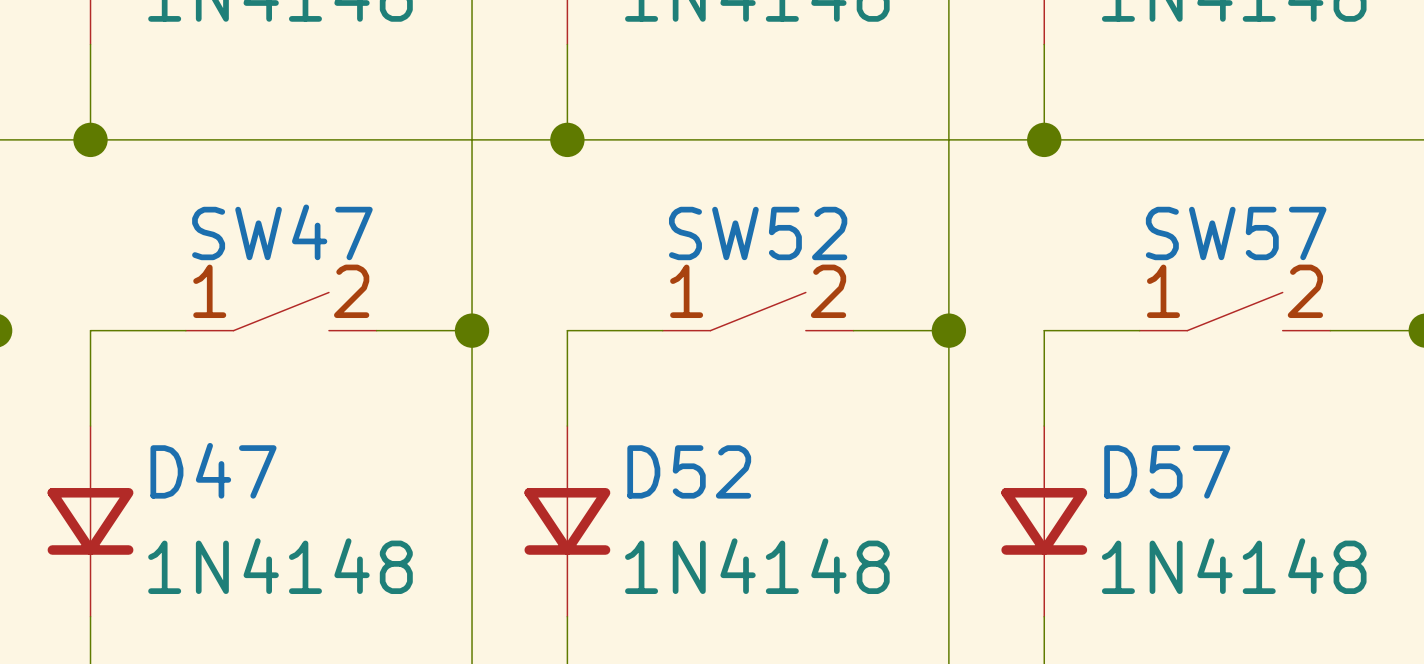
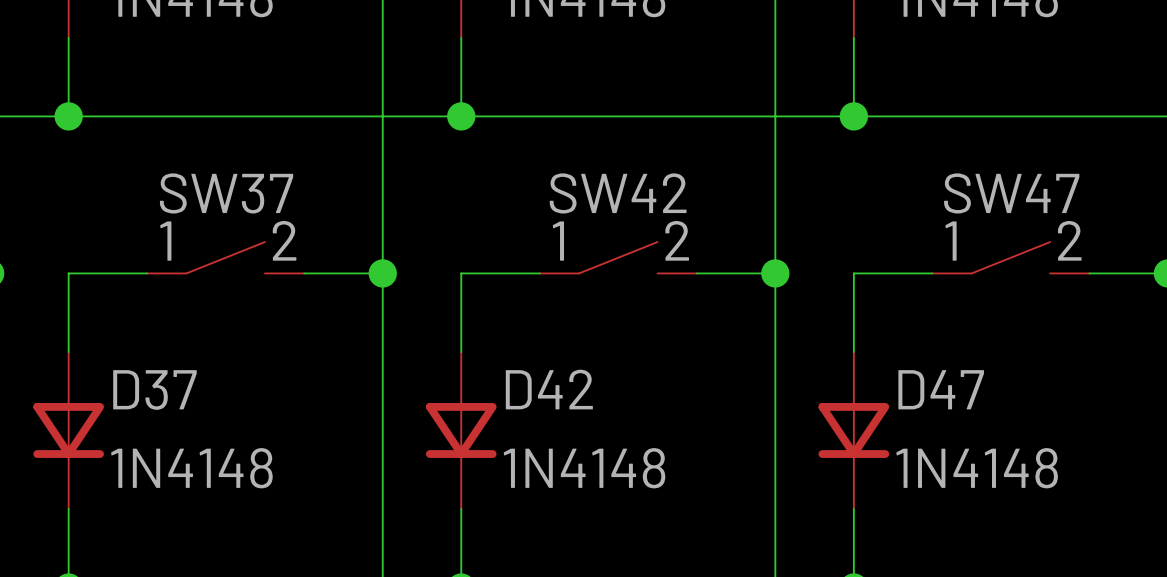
SW47 name: SW47 (282, 232) -> SW37 (226, 193)
SW52 name: SW52 (758, 233) -> SW42 (618, 193)
SW57 name: SW57 (1236, 233) -> SW47 (1011, 193)
D47 name: D47 (213, 470) -> D37 (154, 389)
D52 name: D52 (689, 471) -> D42 (549, 389)
D57 name: D57 (1167, 471) -> D47 (941, 389)

